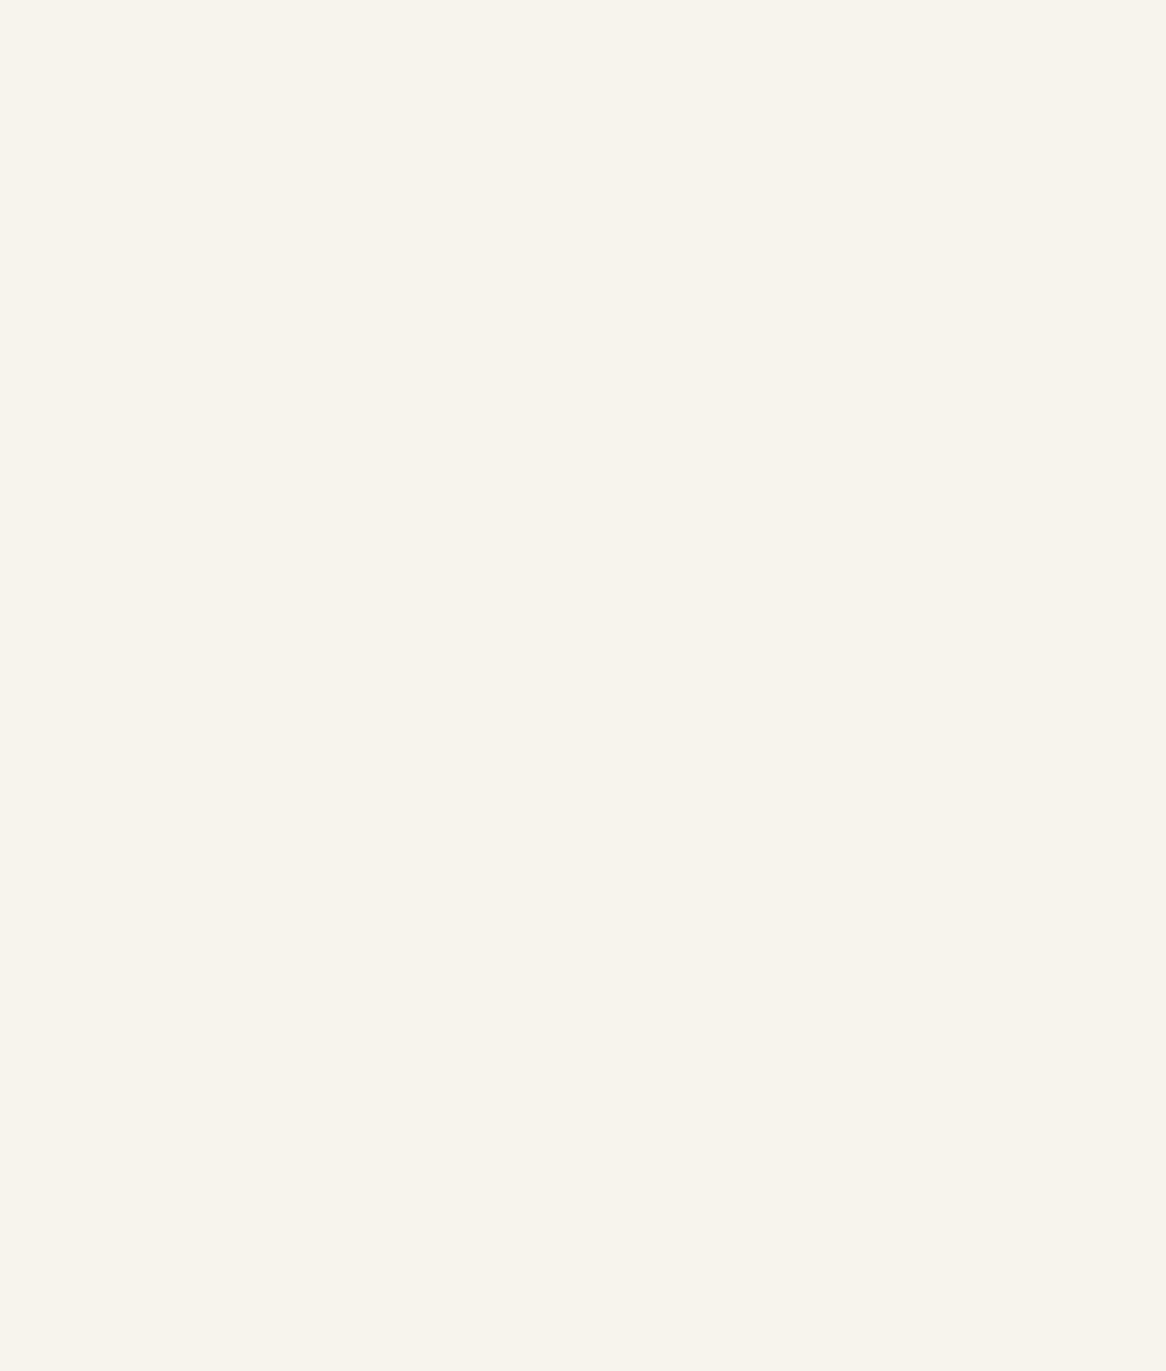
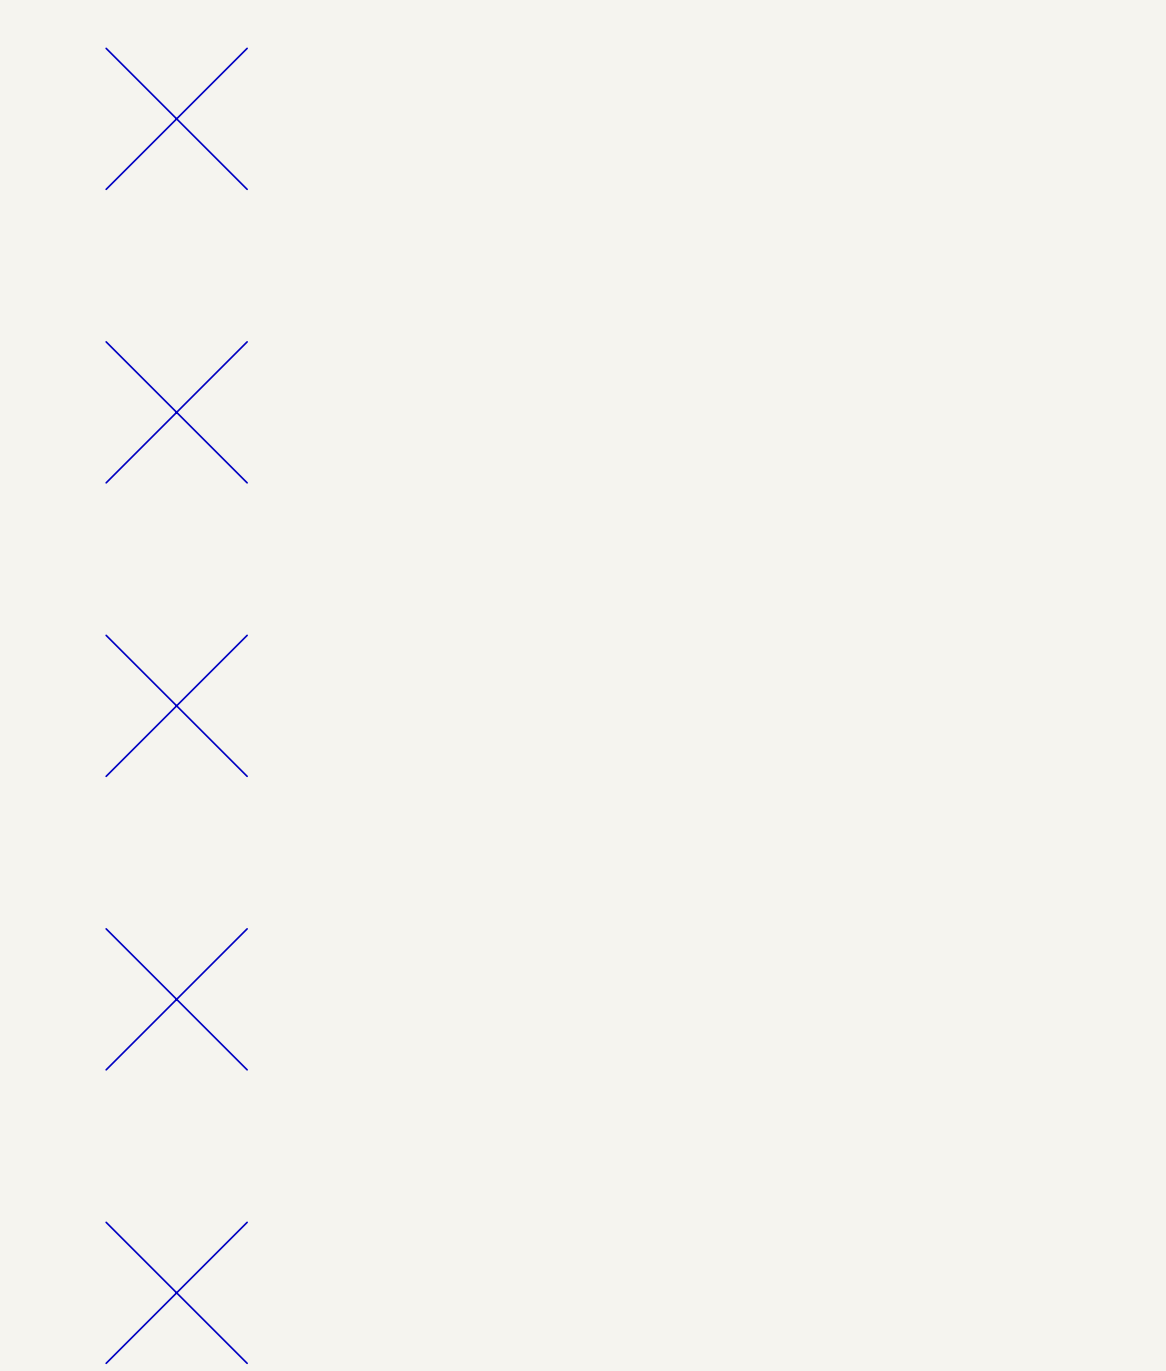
no-connect mark: none -> (176, 118)
no-connect mark: none -> (176, 412)
no-connect mark: none -> (176, 705)
no-connect mark: none -> (176, 999)
no-connect mark: none -> (176, 1292)

